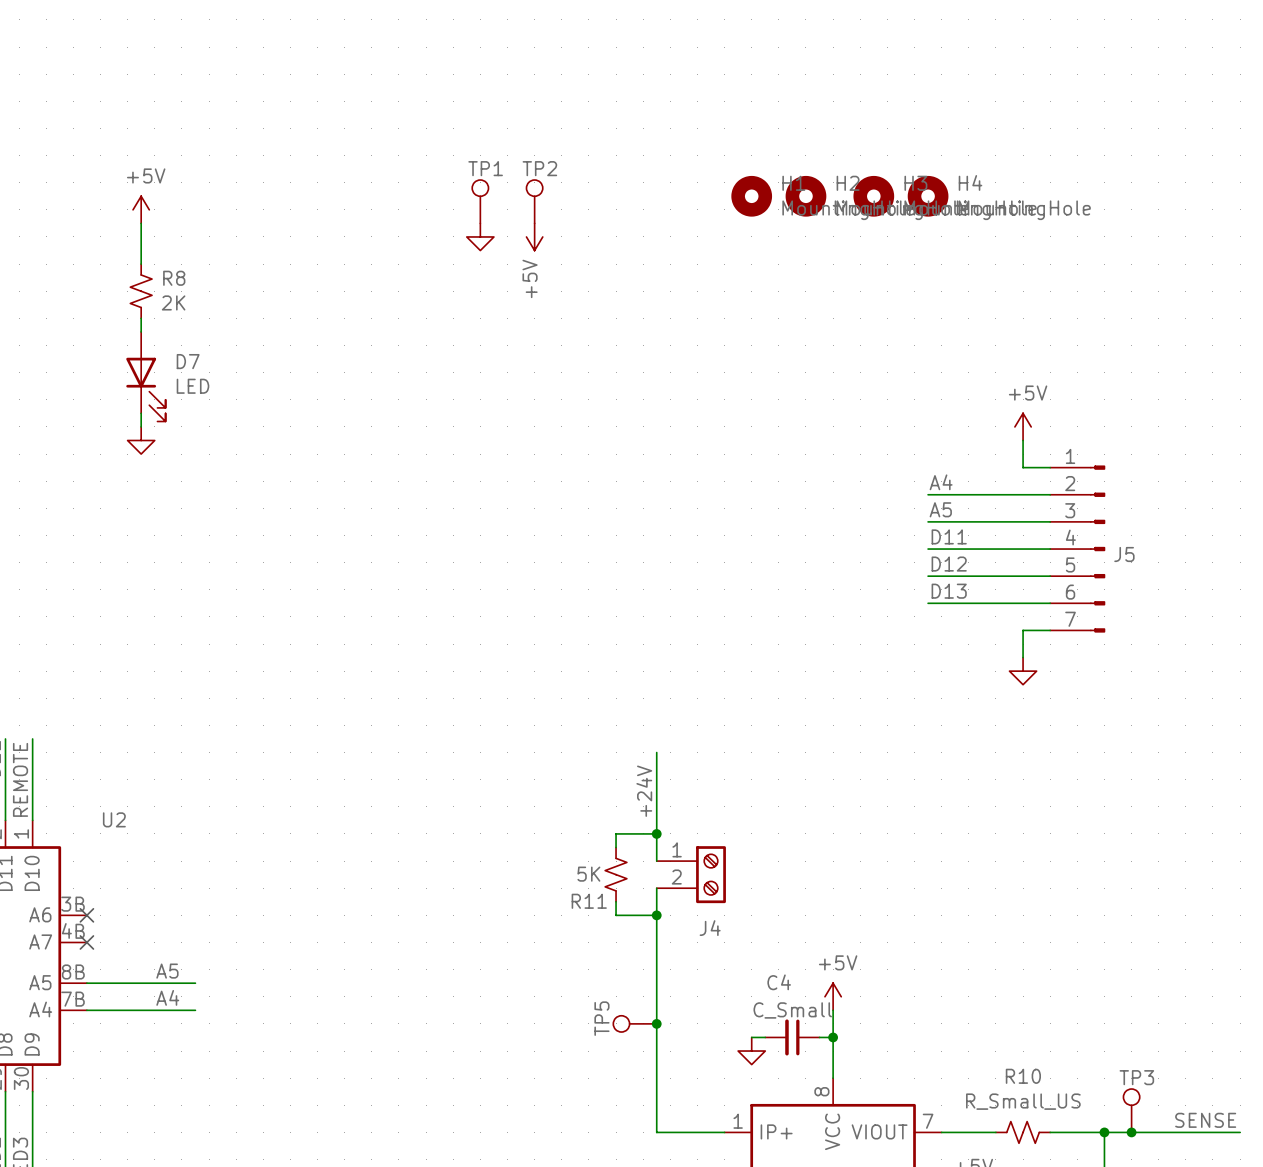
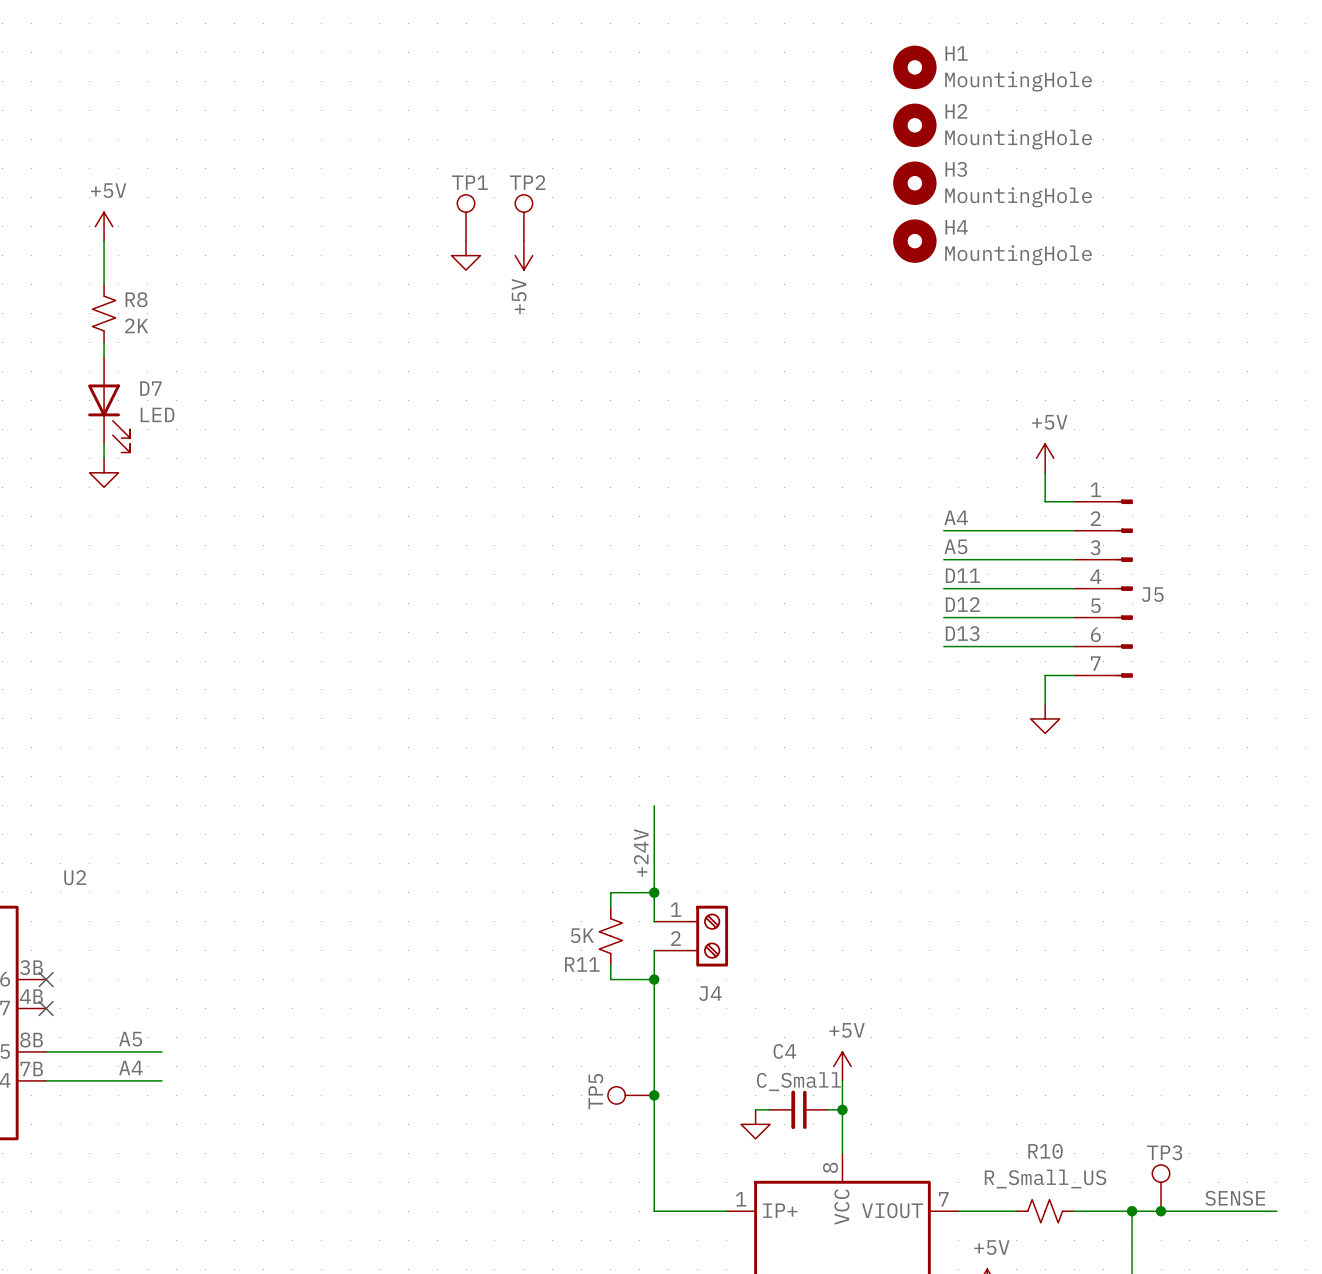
H1 position: (751, 196) -> (914, 67)
H2 position: (805, 196) -> (914, 125)
H3 position: (873, 196) -> (914, 183)
H4 position: (928, 196) -> (914, 241)

